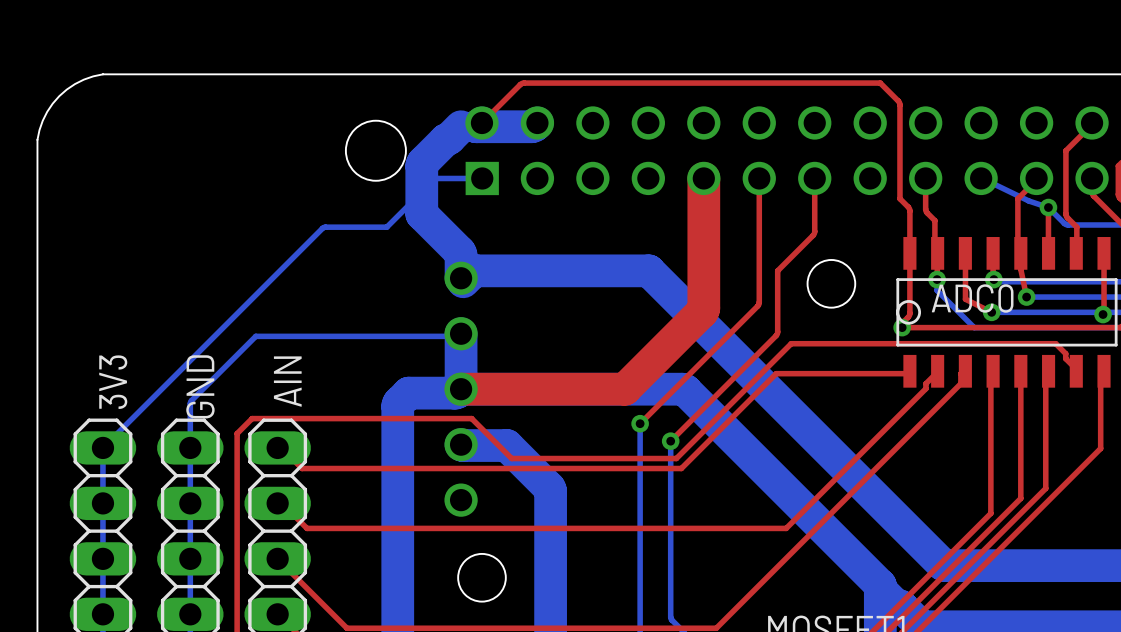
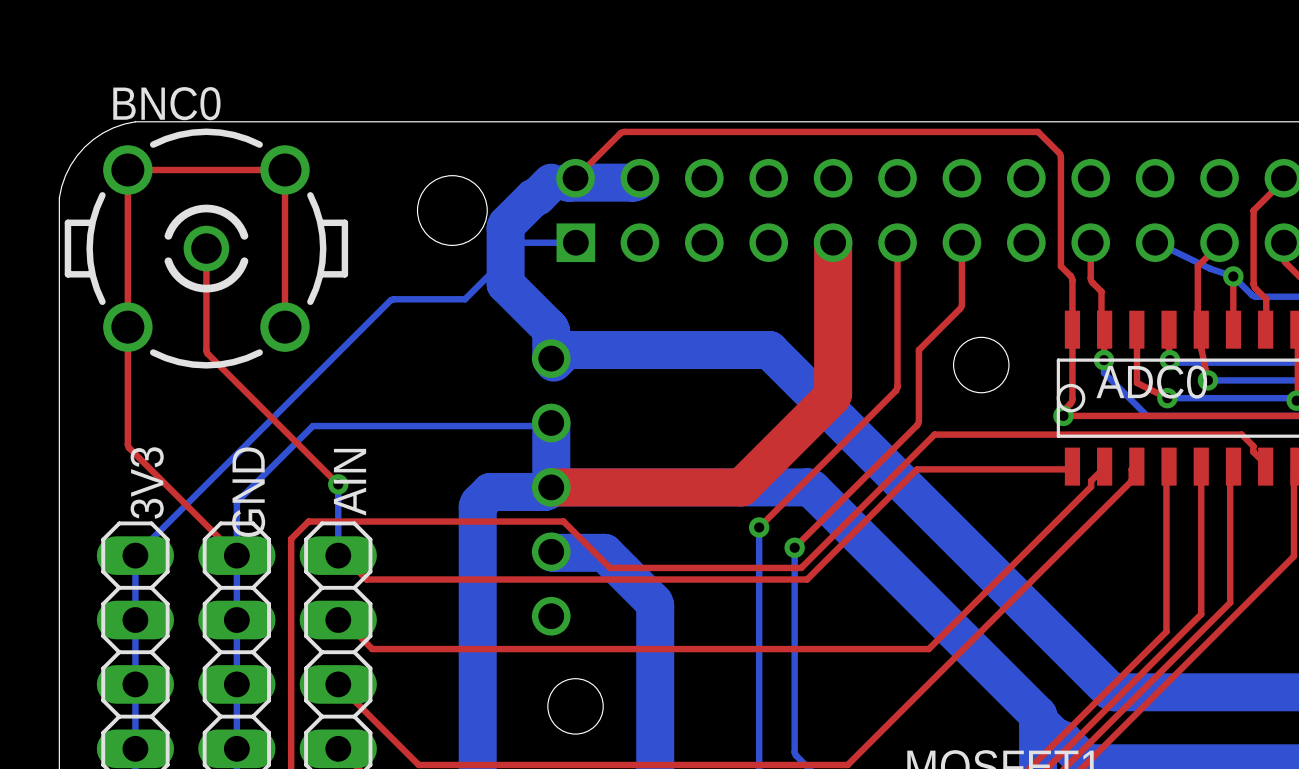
top track: none -> (206, 248) (207, 352) (338, 484)
BNC0: none -> (206, 248)
top track: none -> (284, 327) (284, 169) (127, 169) (128, 445) (236, 555)
bottom track: none -> (338, 484) (338, 555)
via: none -> (338, 484)

